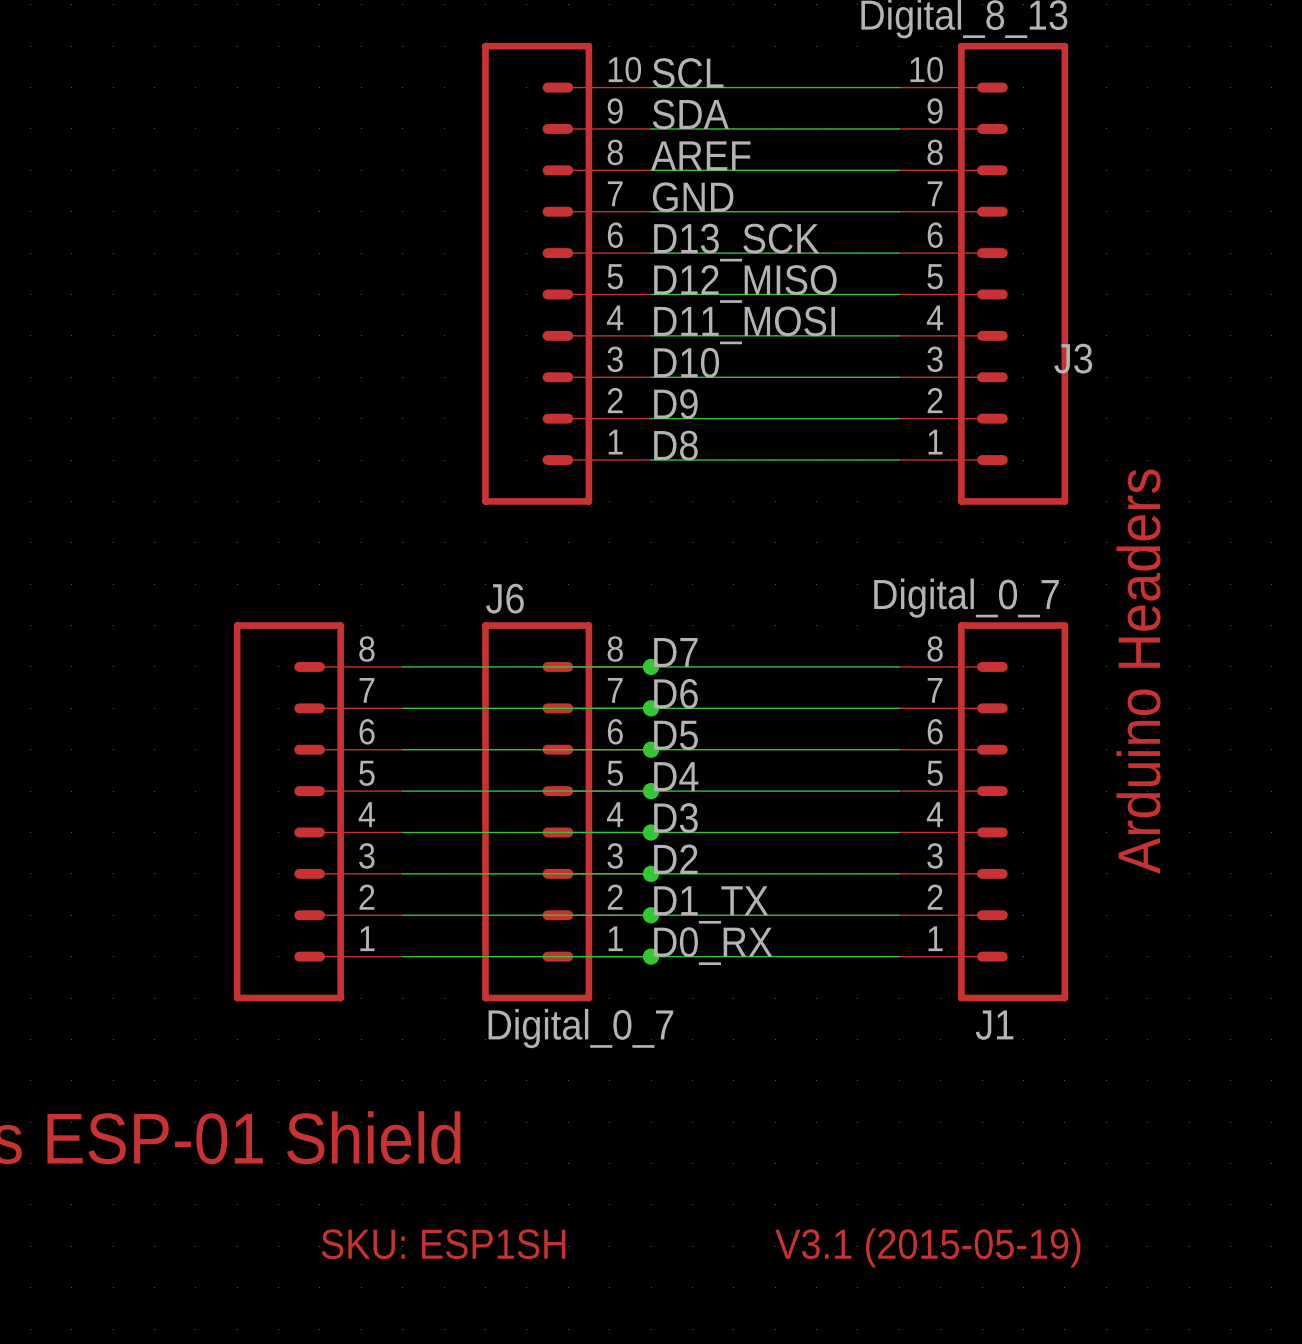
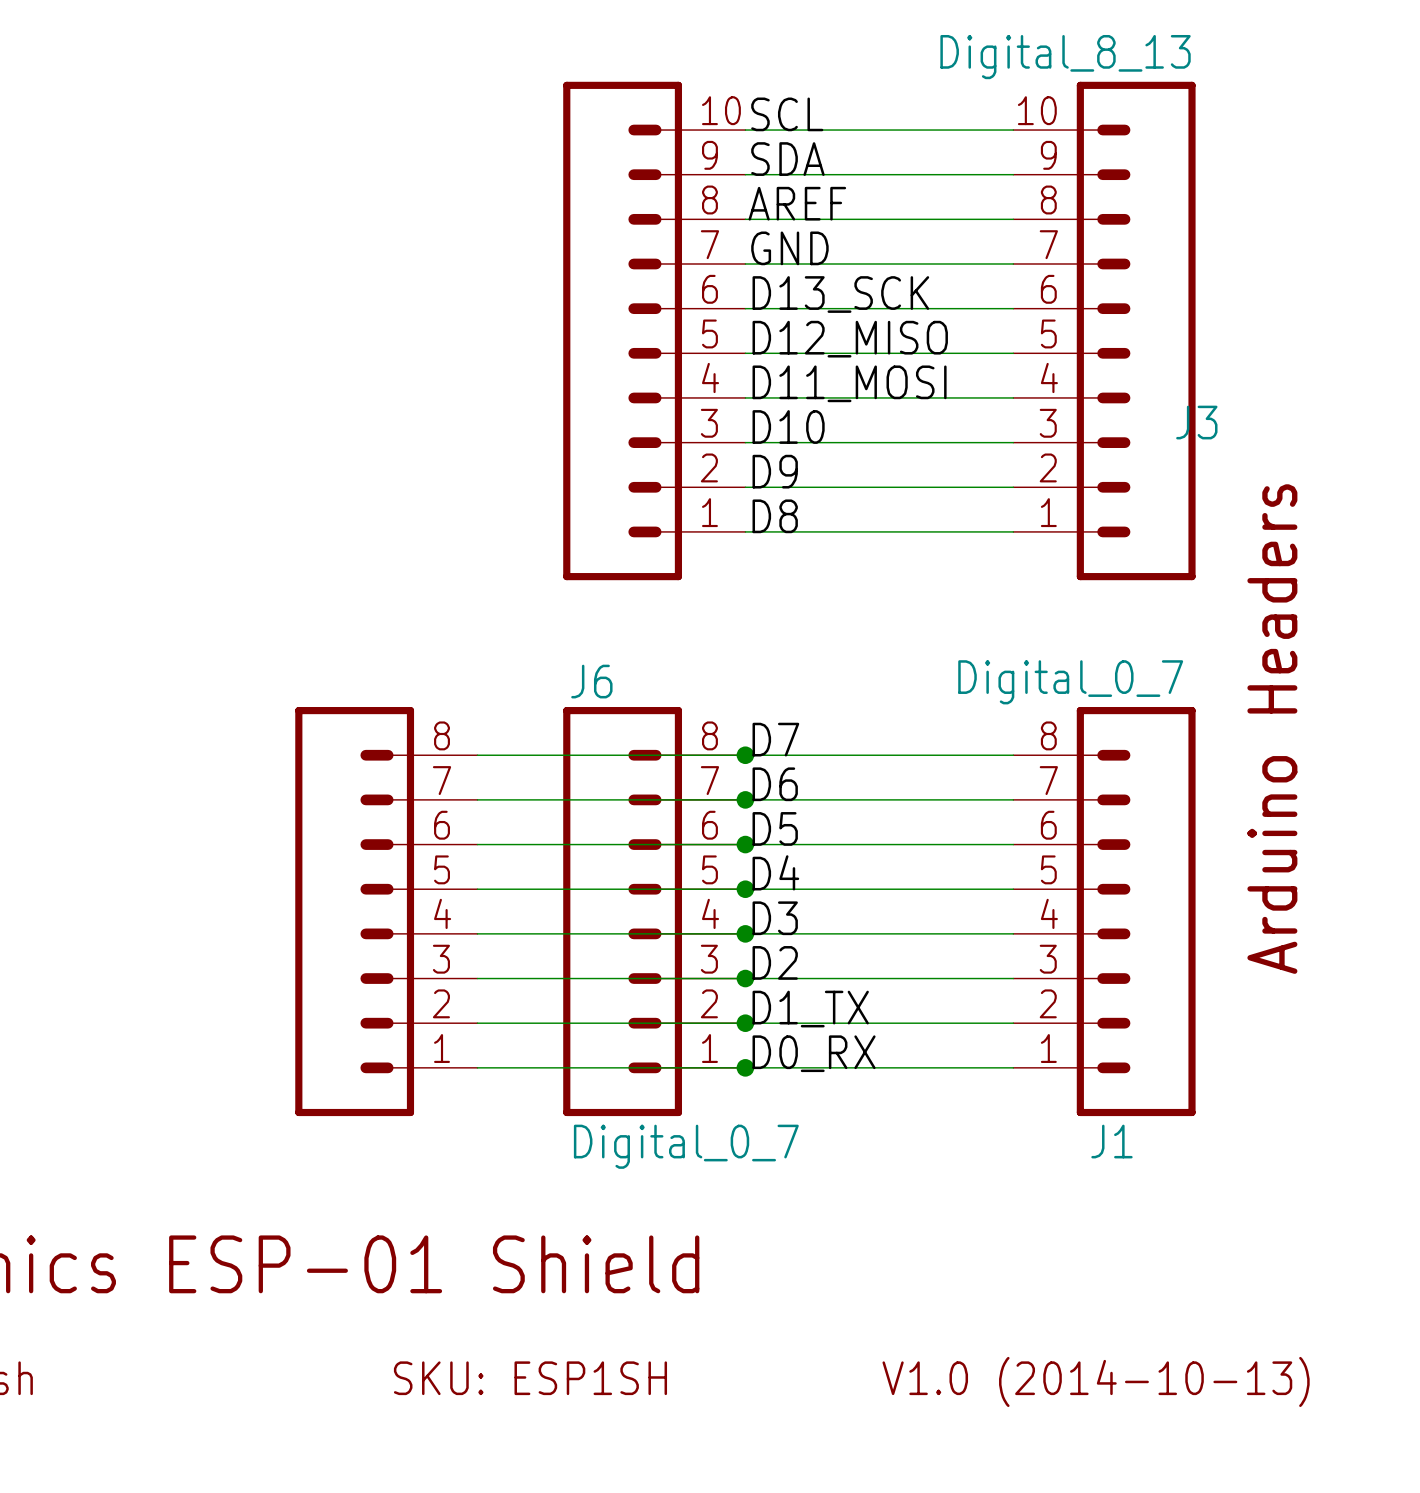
text: V3.1 (2015-05-19) (927, 1247) -> V1.0 (2014-10-13) (1096, 1381)

